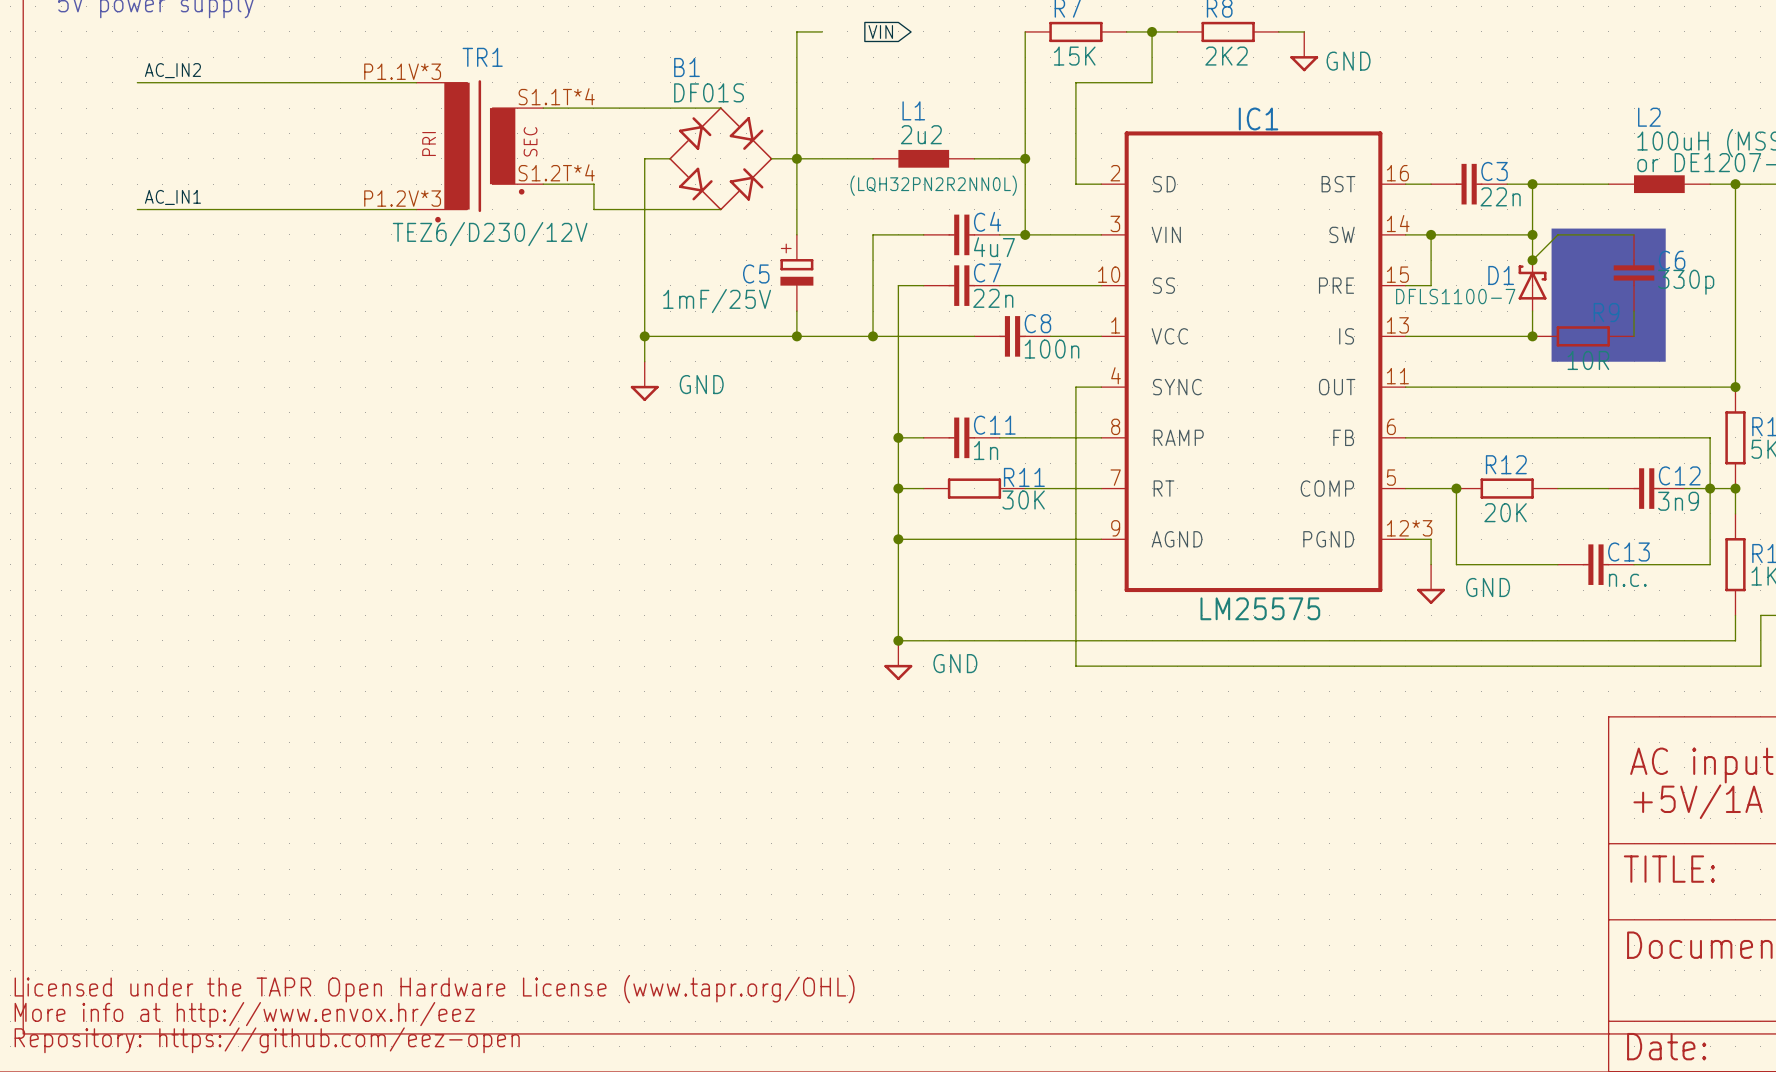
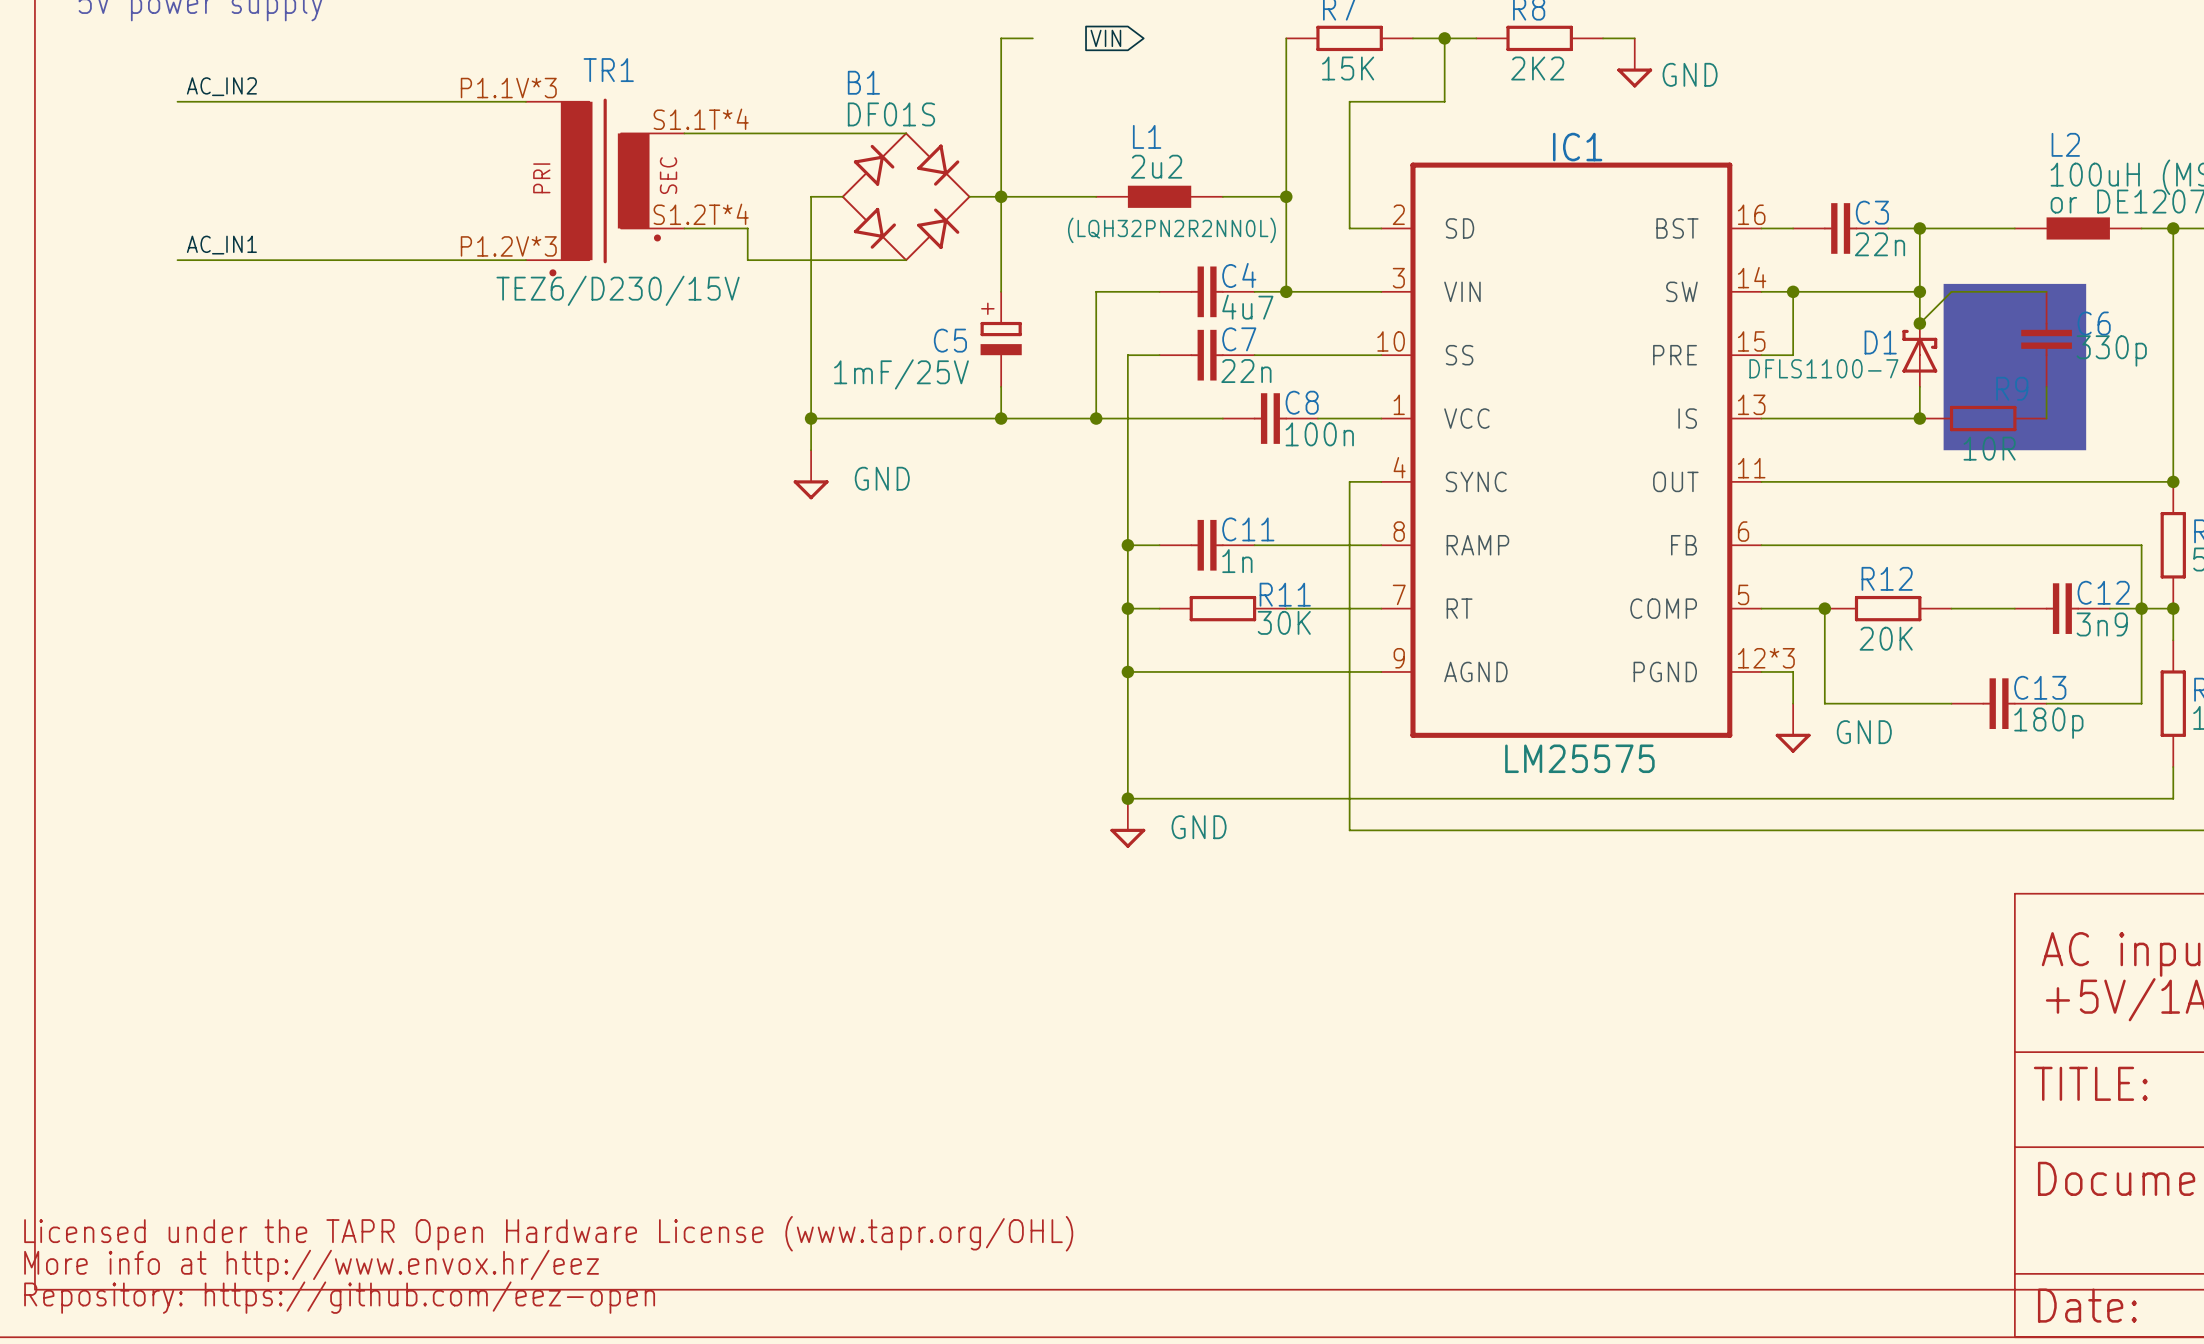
TR1 value: TEZ6/D230/12V (490, 234) -> TEZ6/D230/15V (618, 290)
C13 value: n.c. (1627, 580) -> 180p (2048, 723)

